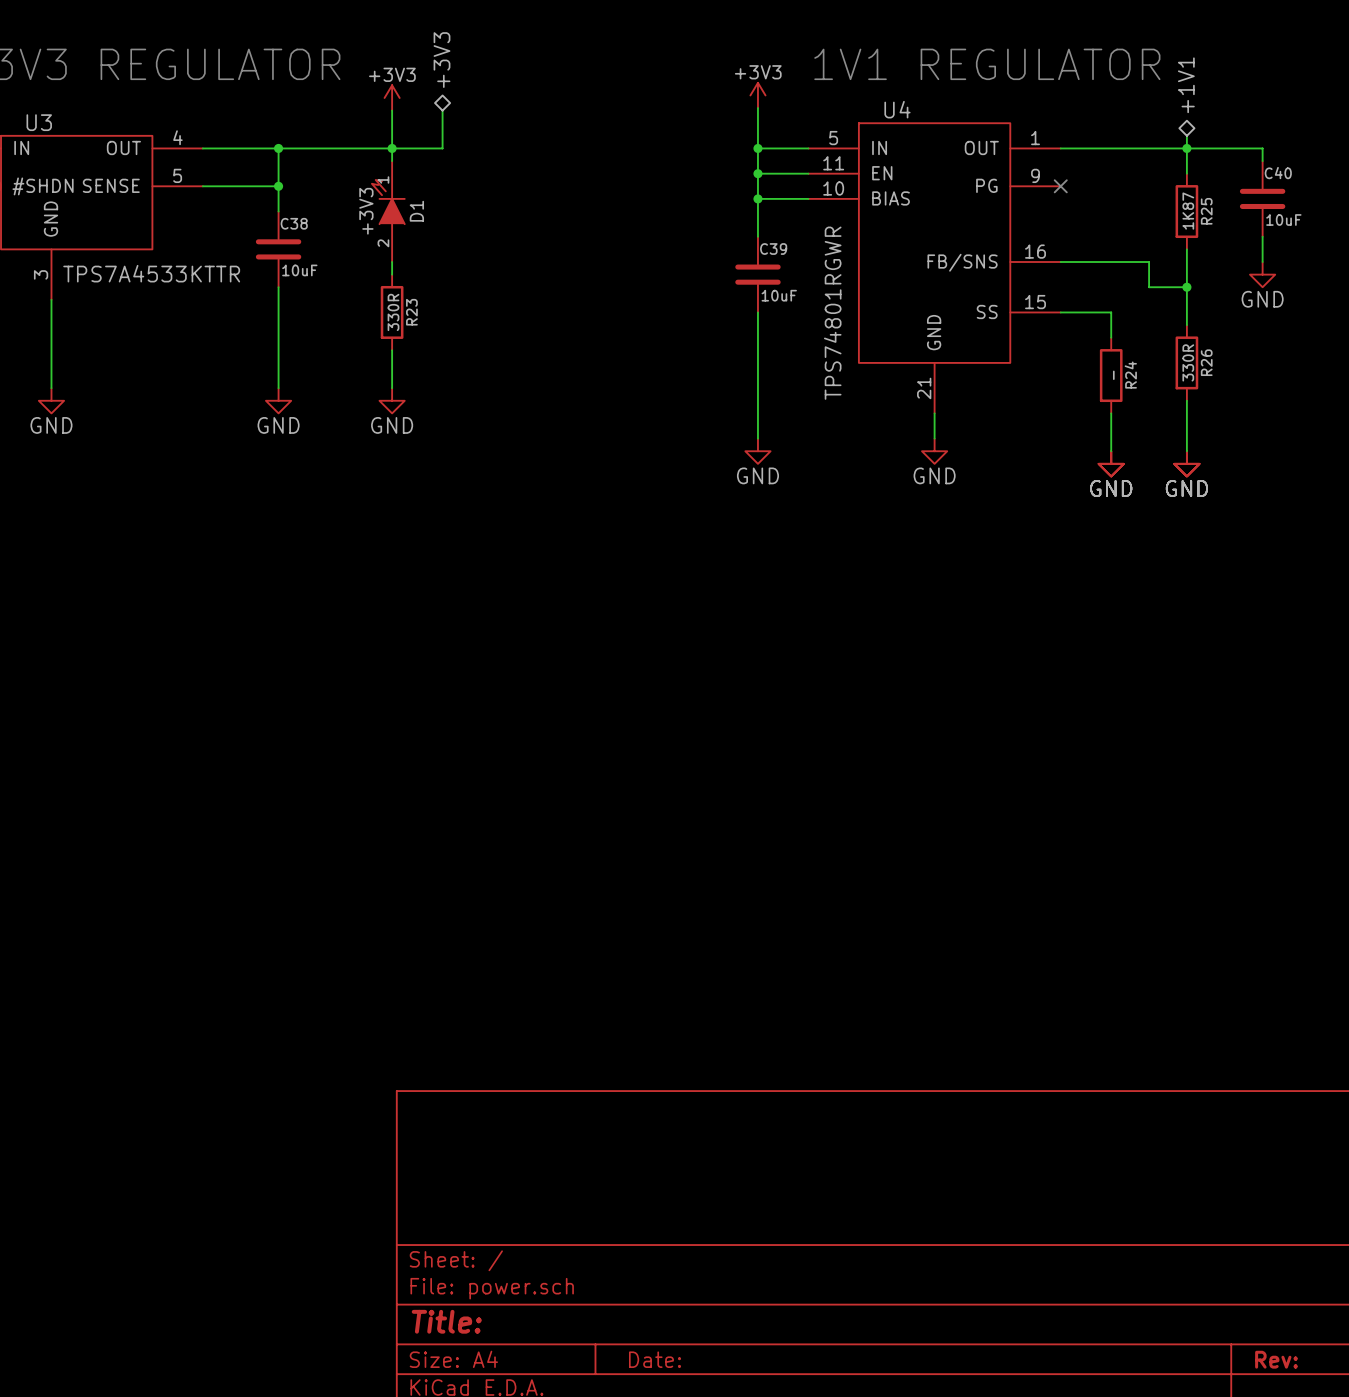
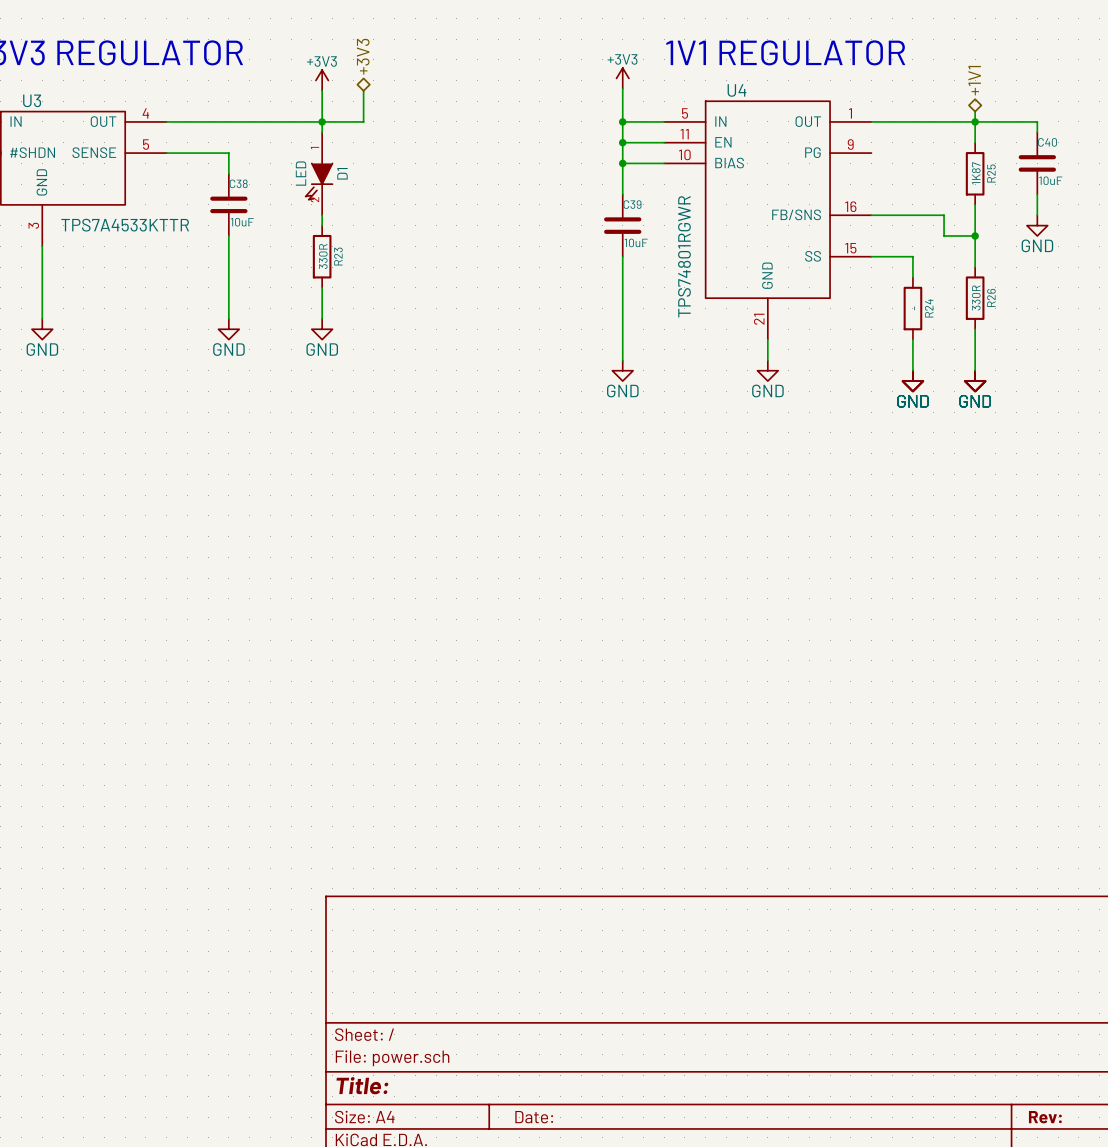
wire: (278, 148) (278, 186) -> none
junction: (278, 148) -> none
D1 symbol: [371, 161, 405, 263] -> [305, 132, 333, 216]
junction: (278, 186) -> none
no-connect mark: (1060, 186) -> none
D1 value: +3V3 (366, 211) -> LED (301, 173)

